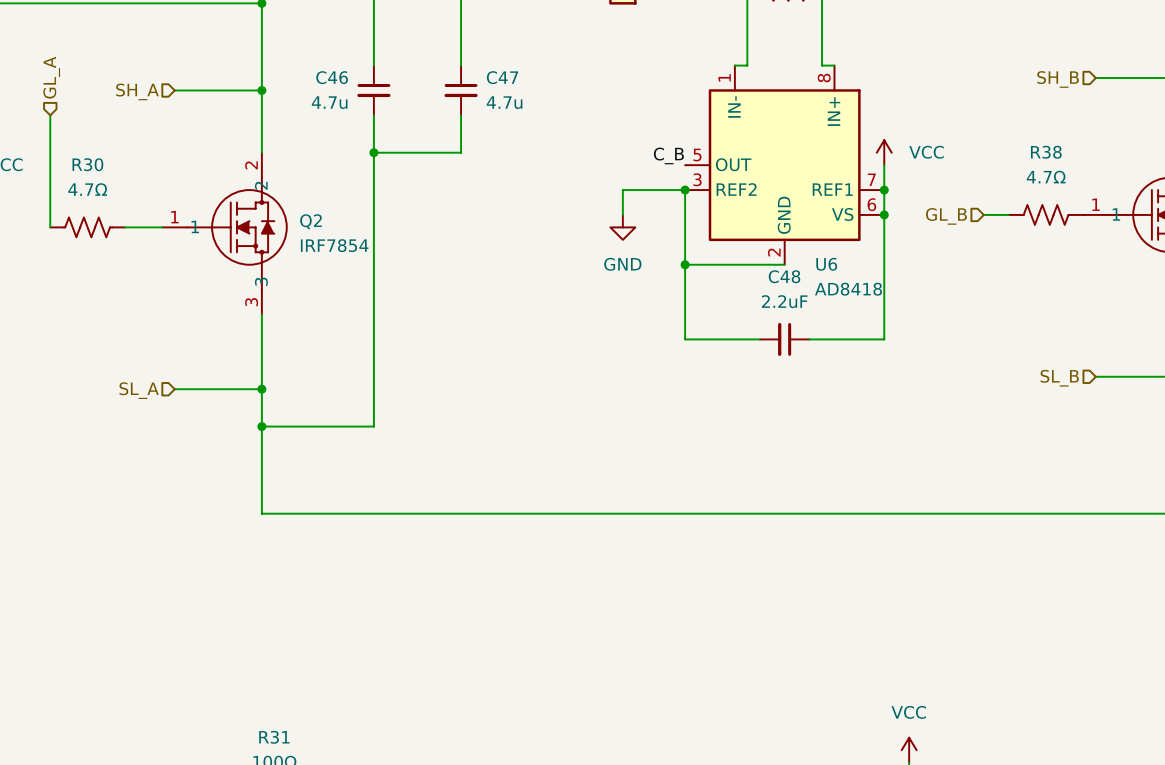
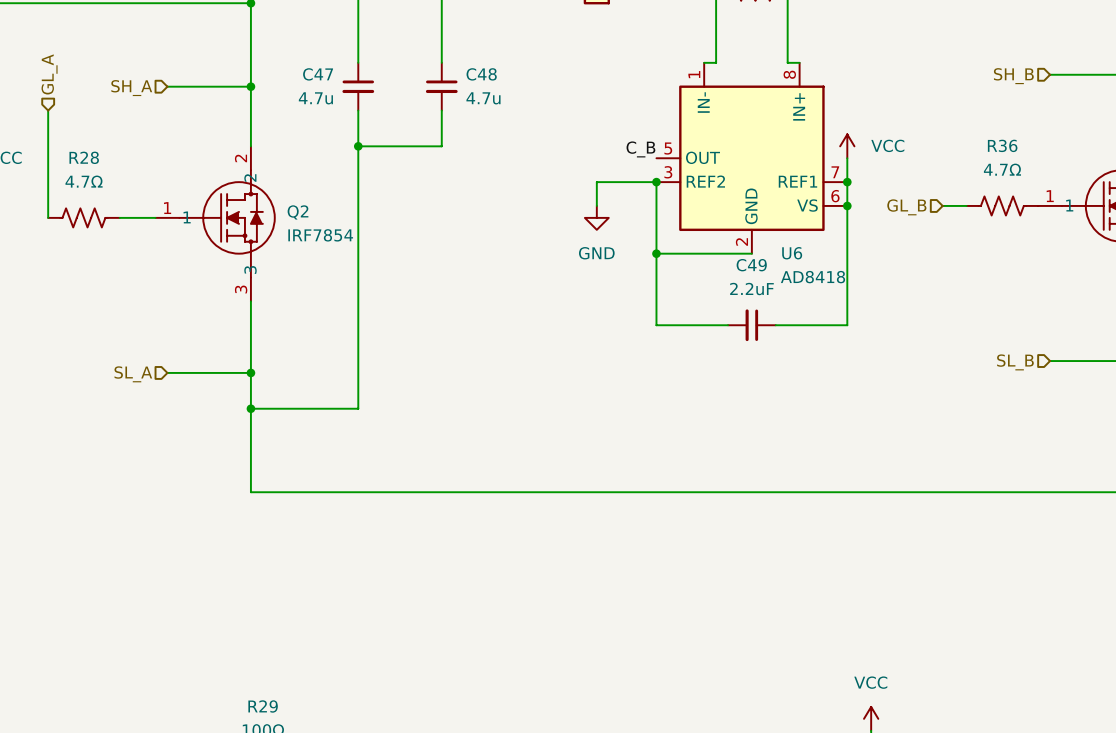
C46 name: C46 (332, 77) -> C47 (318, 74)
C47 name: C47 (502, 77) -> C48 (481, 74)
R38 name: R38 (1046, 152) -> R36 (1002, 145)
R30 name: R30 (87, 164) -> R28 (84, 157)
C48 name: C48 (784, 276) -> C49 (751, 265)
R31 name: R31 (274, 737) -> R29 (263, 706)

